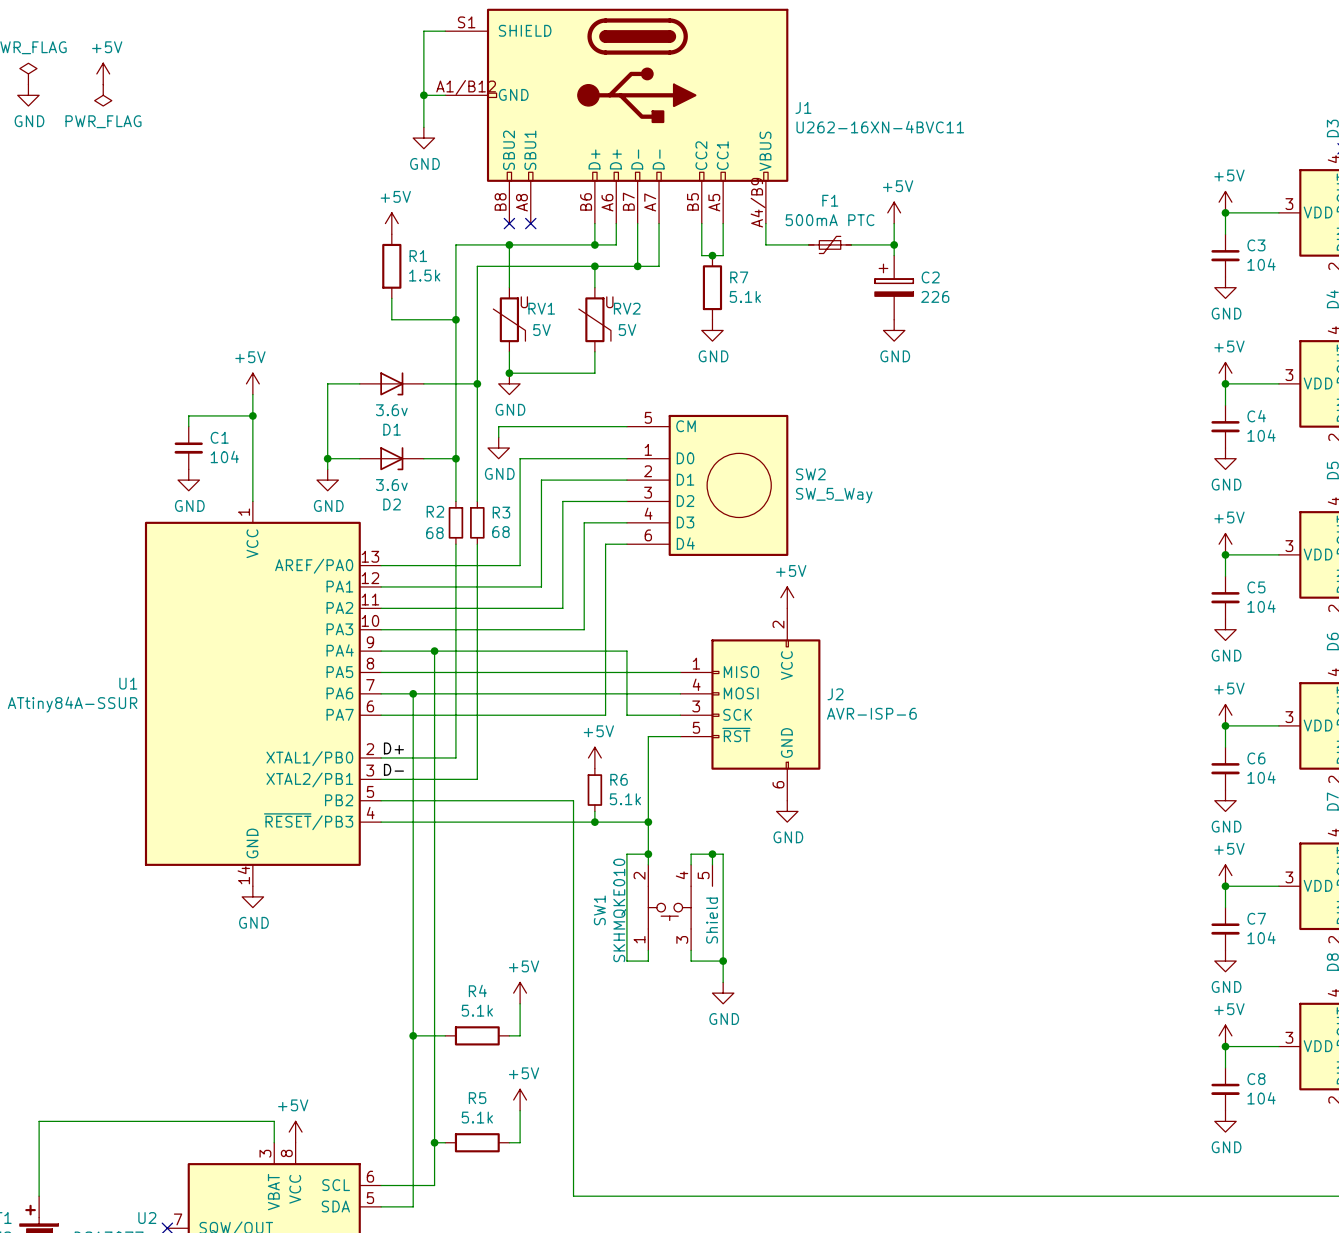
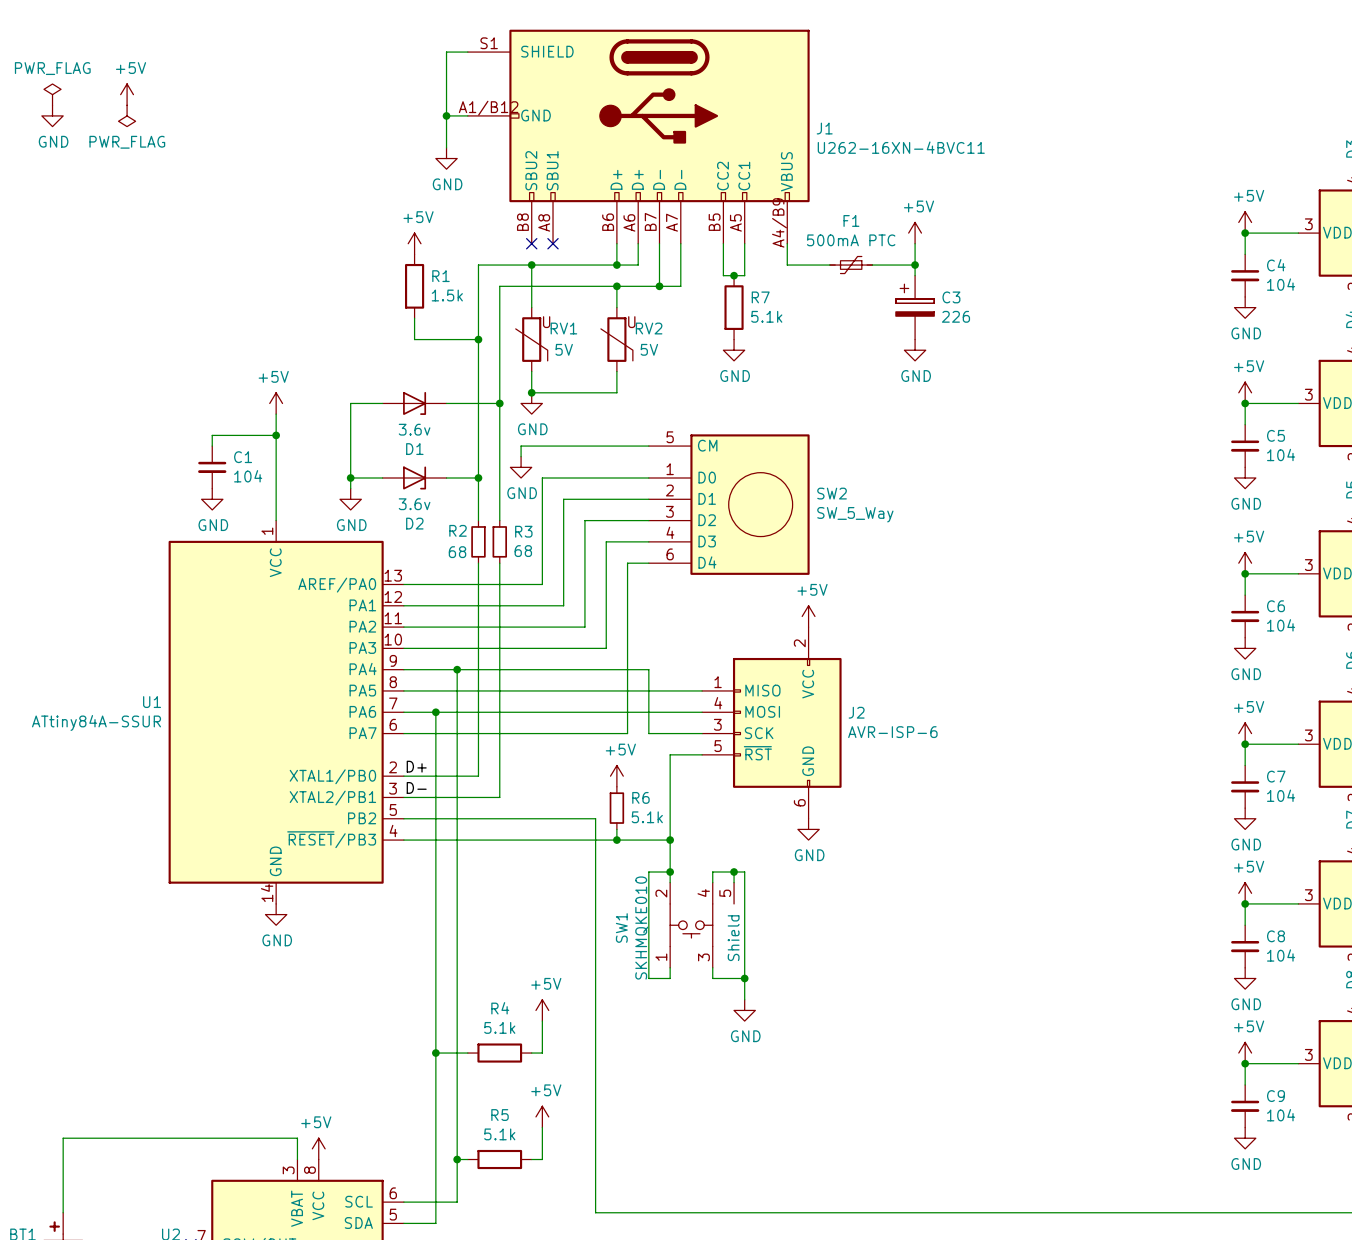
C3 name: C3 (1256, 245) -> C4 (1276, 265)
C2 name: C2 (930, 277) -> C3 (951, 297)
C4 name: C4 (1256, 416) -> C5 (1276, 435)
C5 name: C5 (1256, 587) -> C6 (1276, 606)
C6 name: C6 (1256, 758) -> C7 (1276, 776)
C7 name: C7 (1256, 918) -> C8 (1276, 936)
C8 name: C8 (1256, 1079) -> C9 (1276, 1096)

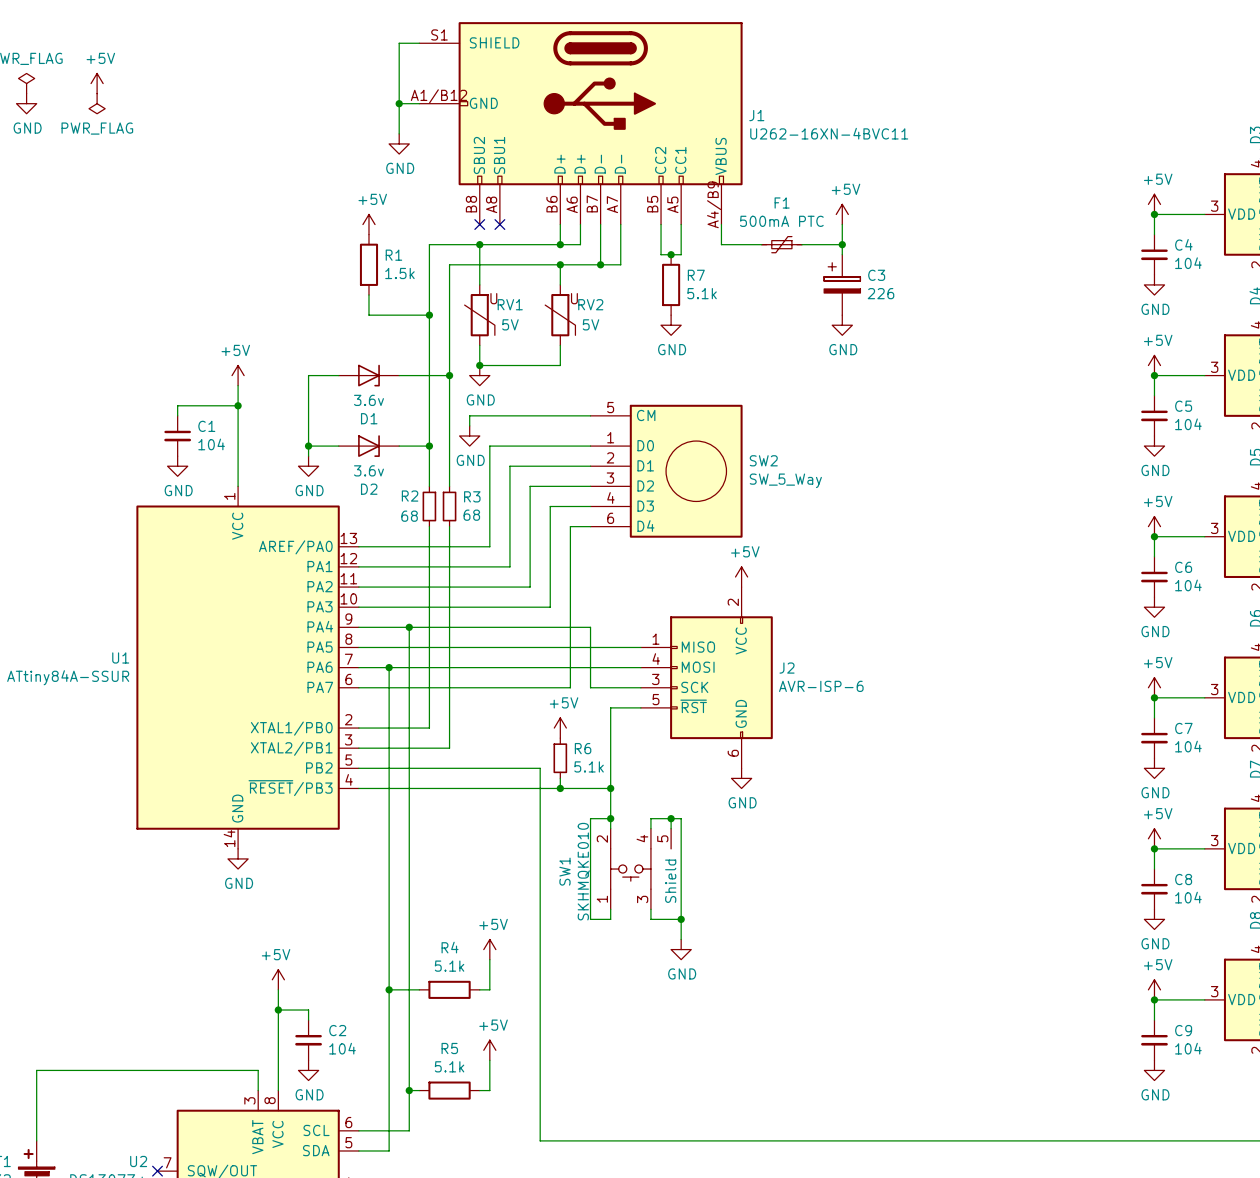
label: D+ (416, 766) -> none
label: D- (416, 787) -> none
wire: none -> (278, 989) (278, 1090)
wire: none -> (278, 1010) (308, 1010) (308, 1020)
junction: none -> (278, 1010)
C2: none -> 104 (308, 1040)
power symbol: none -> GND (308, 1070)
power symbol position: +5V (318, 1148) -> +5V (278, 979)

